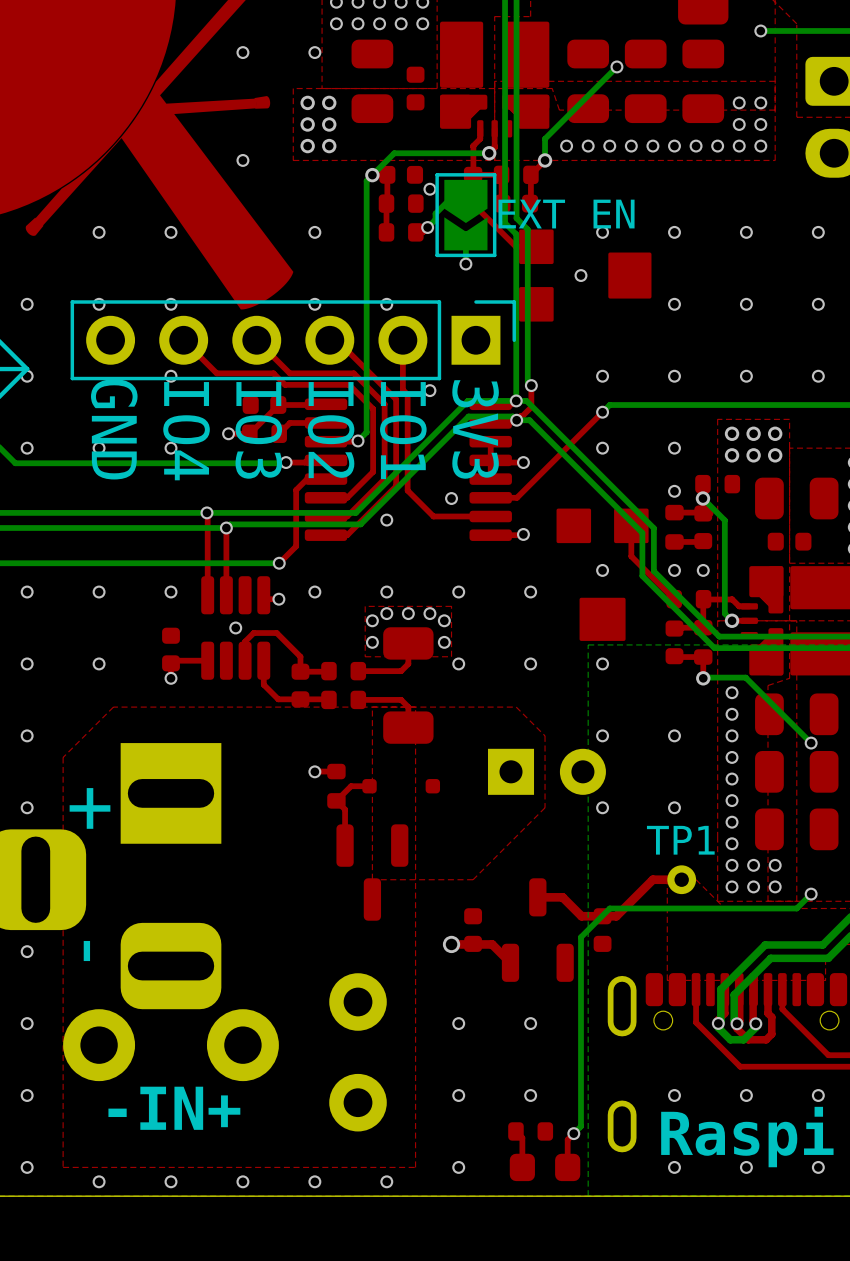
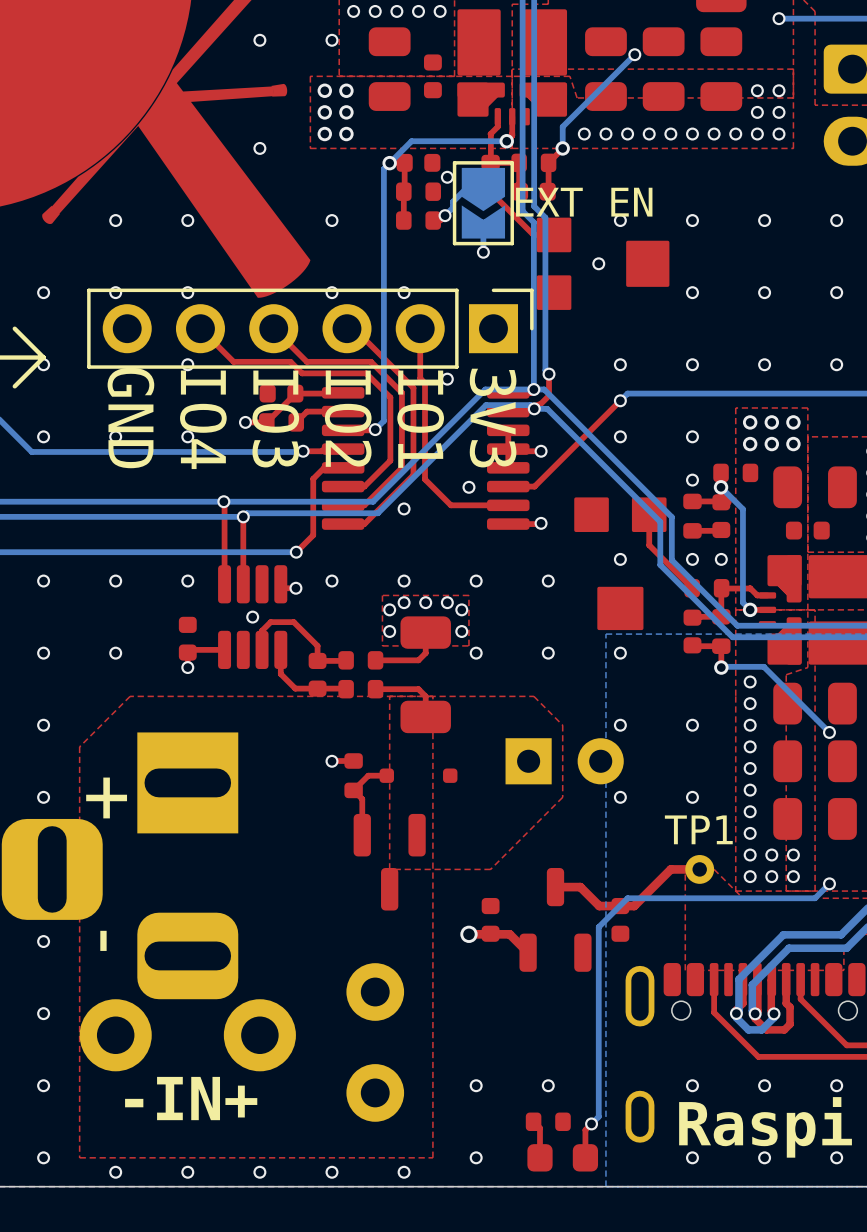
via: (458, 1023) -> none
via: (530, 1023) -> none

